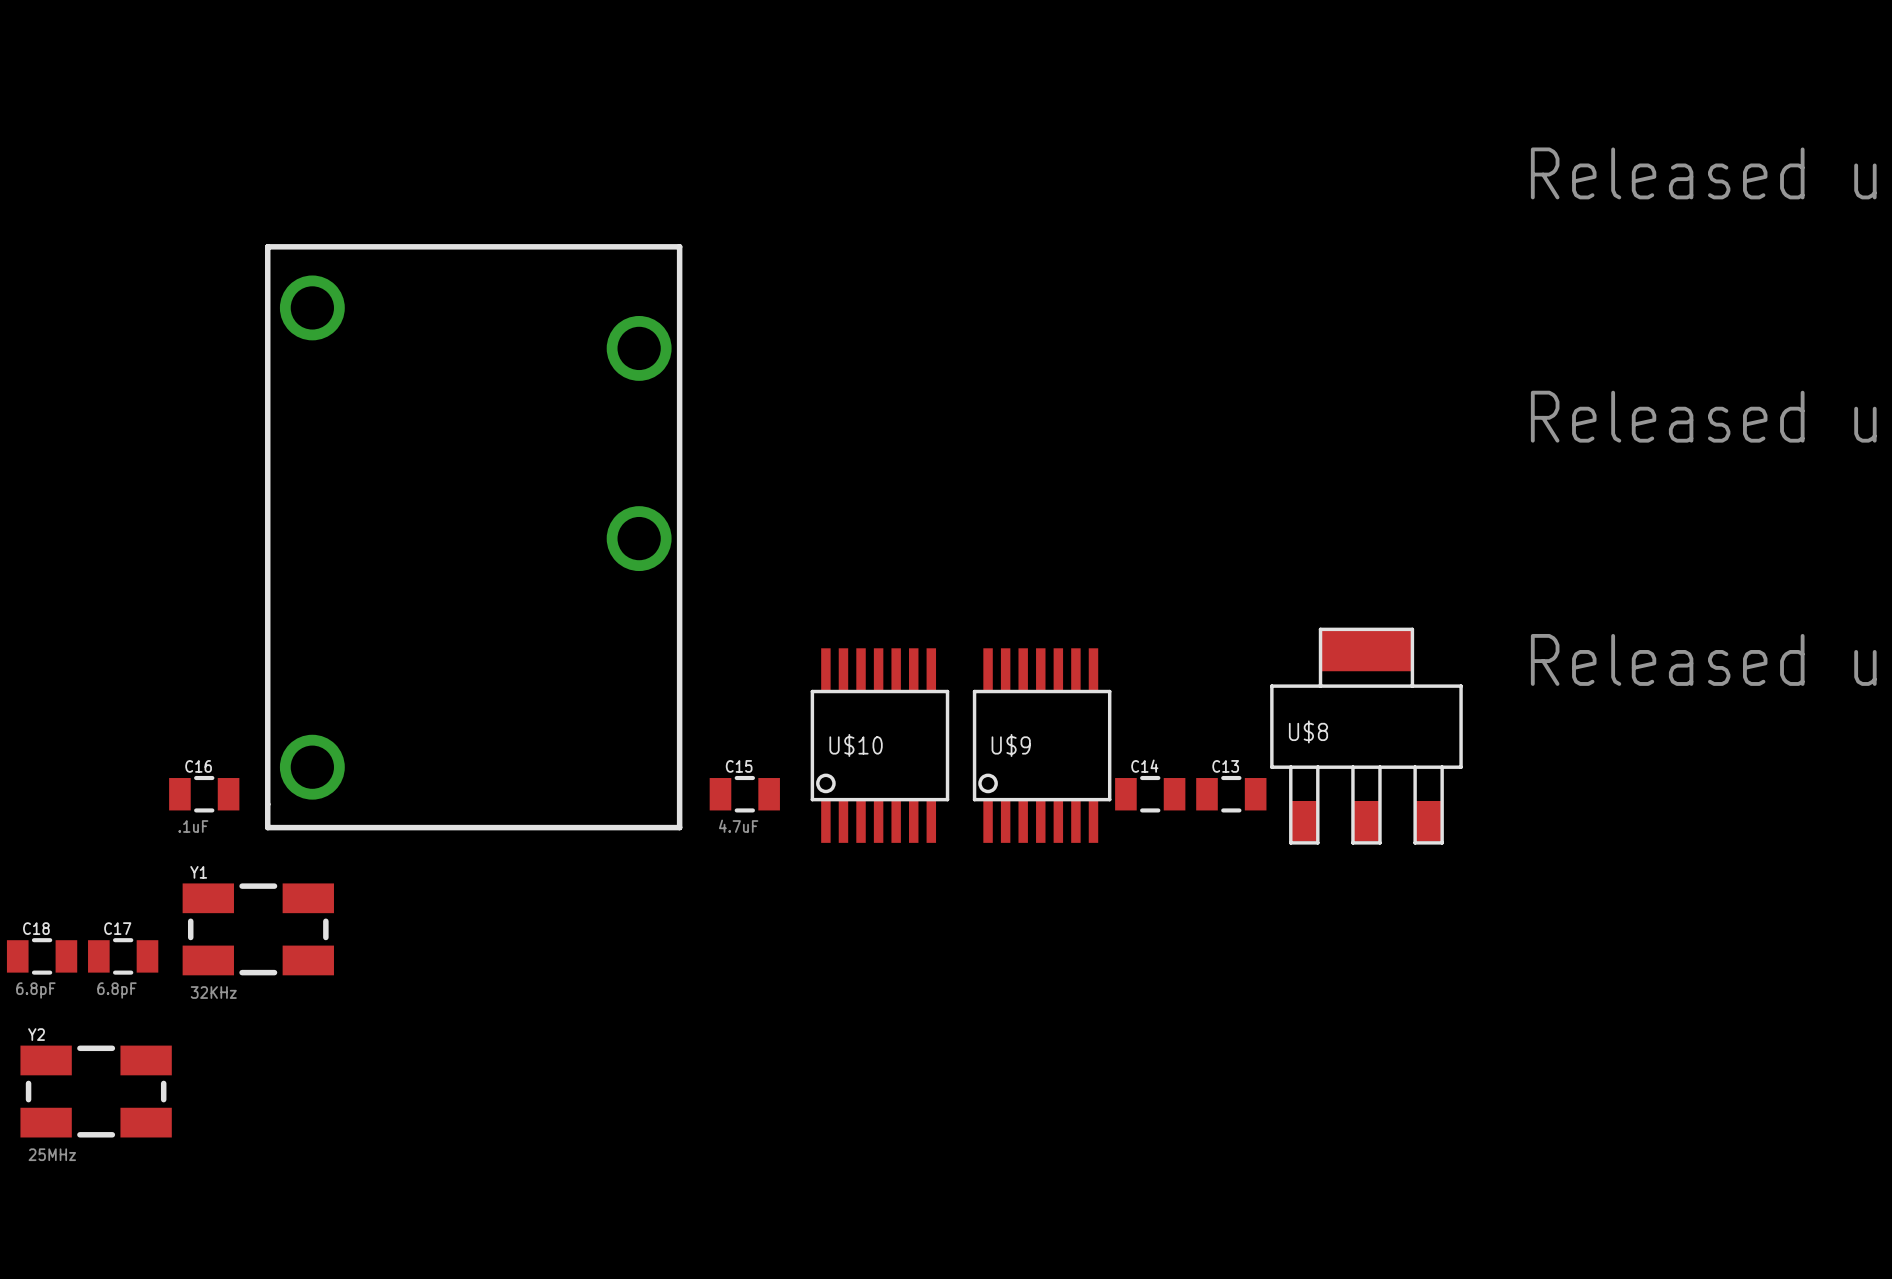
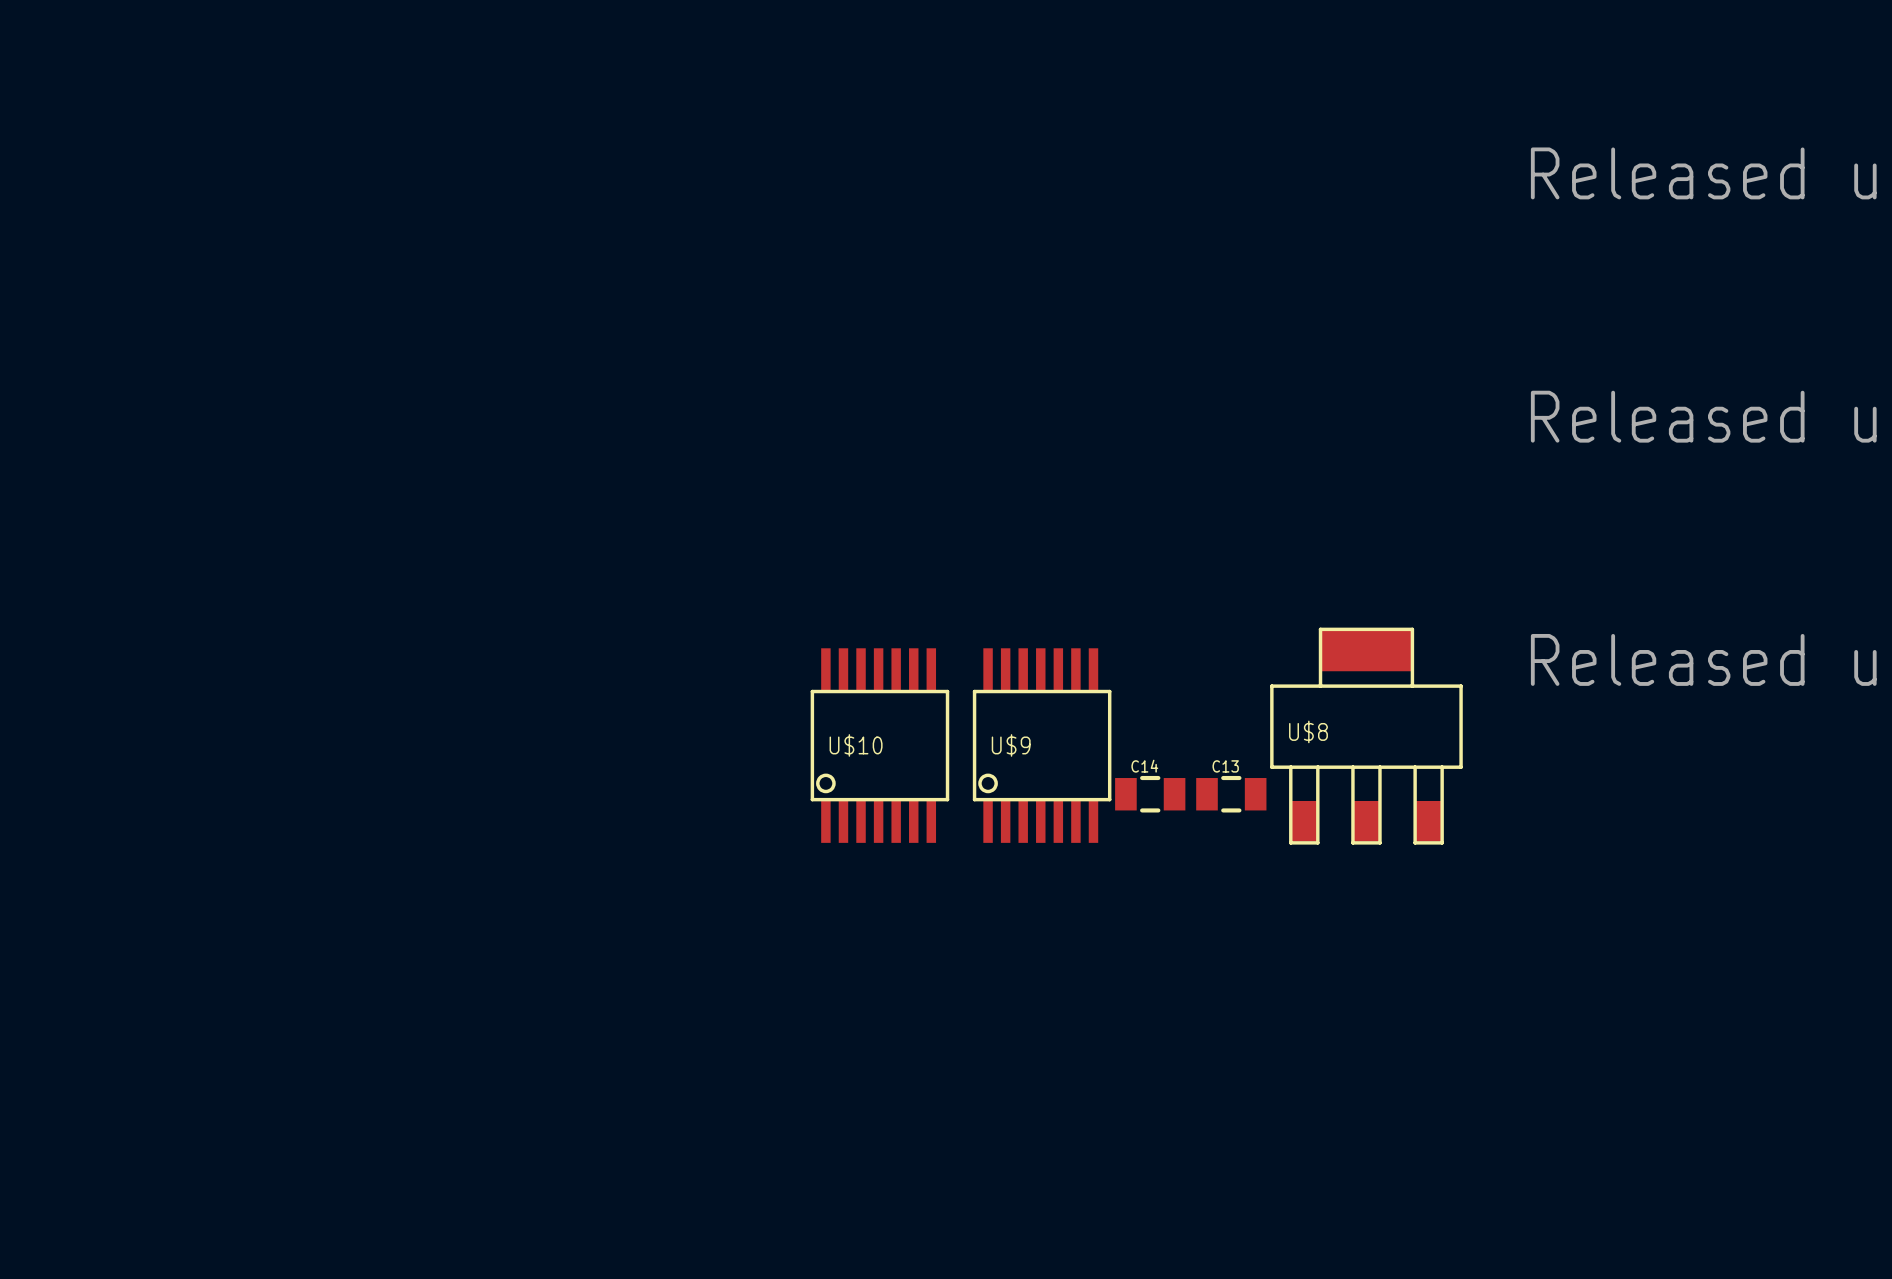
part: (473, 537) -> none
C16: .1uF (204, 794) -> none
C15: 4.7uF (744, 794) -> none
Y1: 32KHz (258, 929) -> none
C18: 6.8pF (42, 956) -> none
C17: 6.8pF (123, 956) -> none
Y2: 25MHz (96, 1091) -> none

